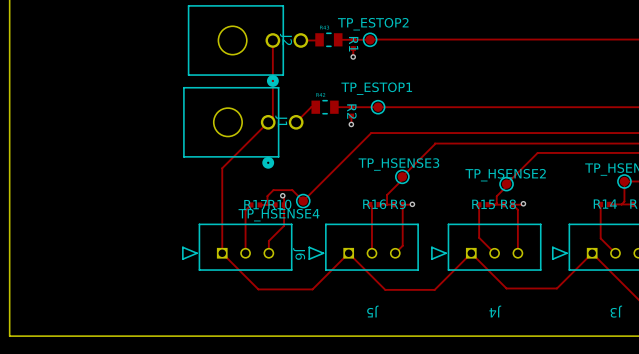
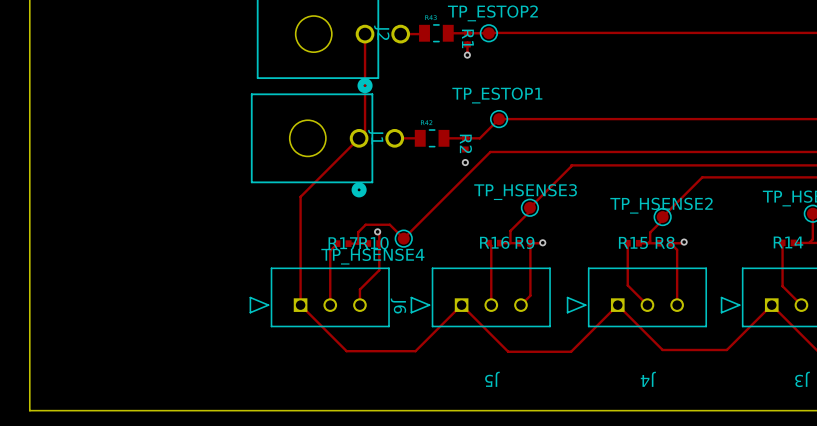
track: (315, 107) (311, 107) (296, 122) -> (420, 138) (394, 138)
part position: (325, 107) -> (432, 138)
track: (334, 107) (378, 107) -> (443, 138) (479, 138) (499, 119)
R2 position: (351, 111) -> (465, 143)
track: (351, 115) (351, 124) -> none
via position: (351, 124) -> (465, 162)

